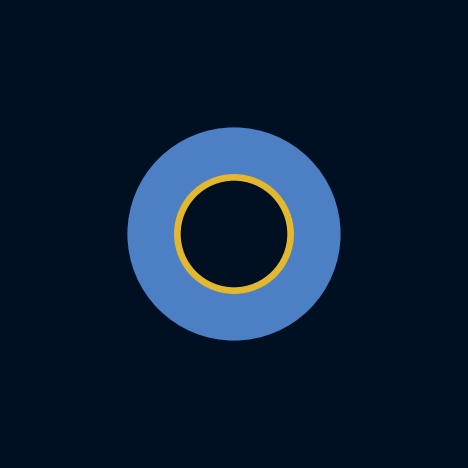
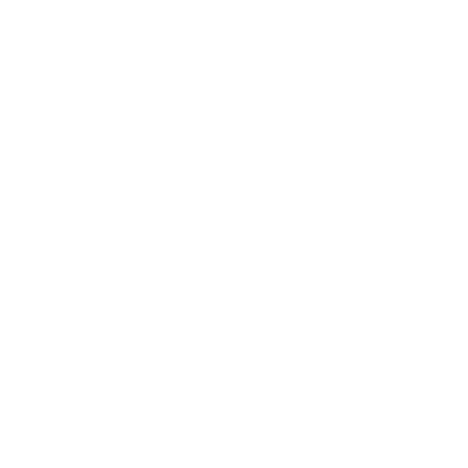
part: (233, 233) -> none

